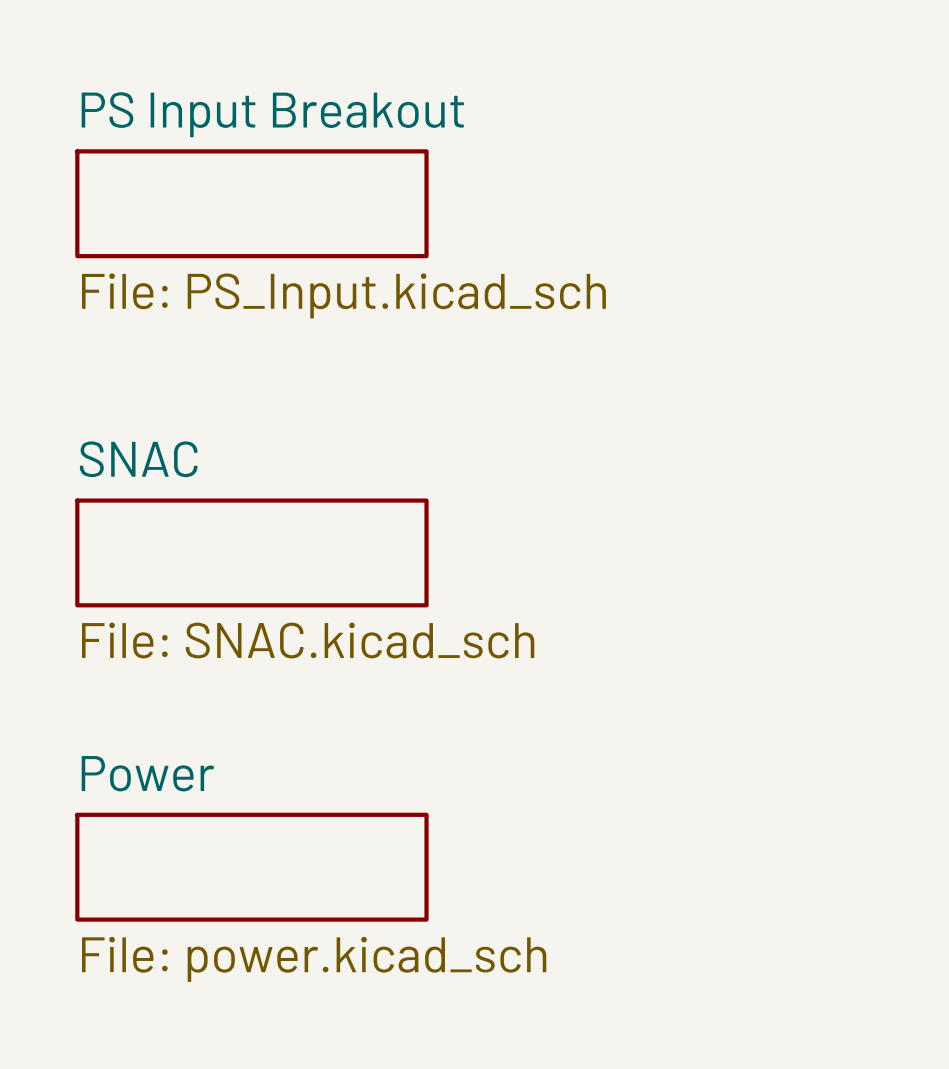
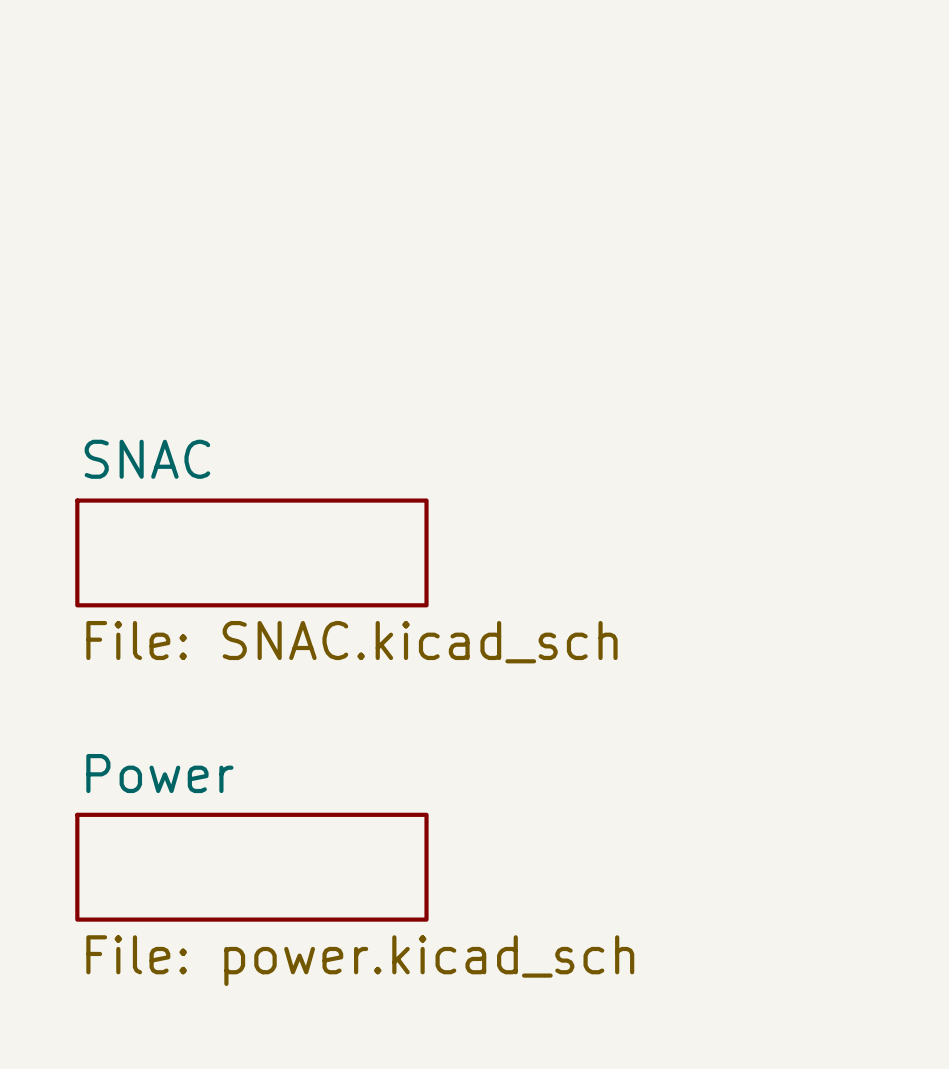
sheet PS Input Breakout: File: PS_Input.kicad_sch (251, 203) -> none

